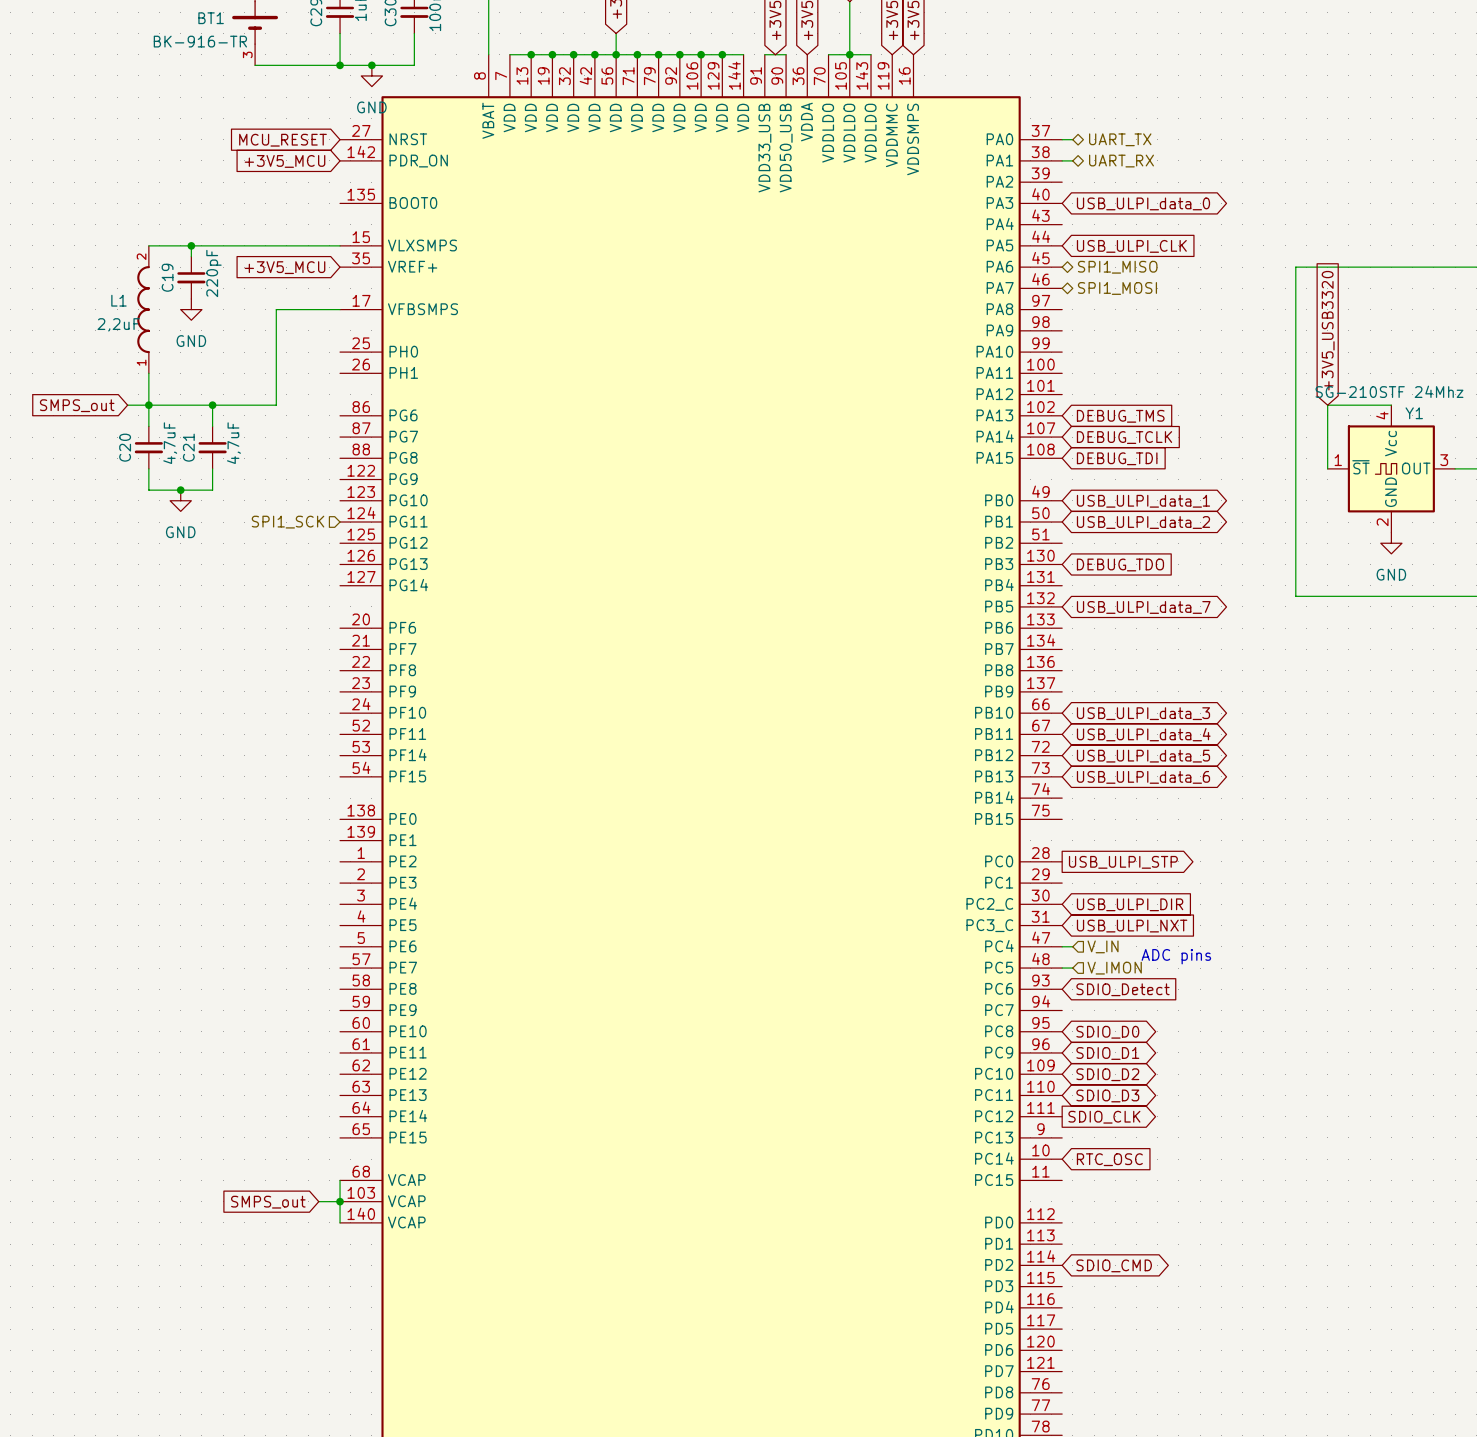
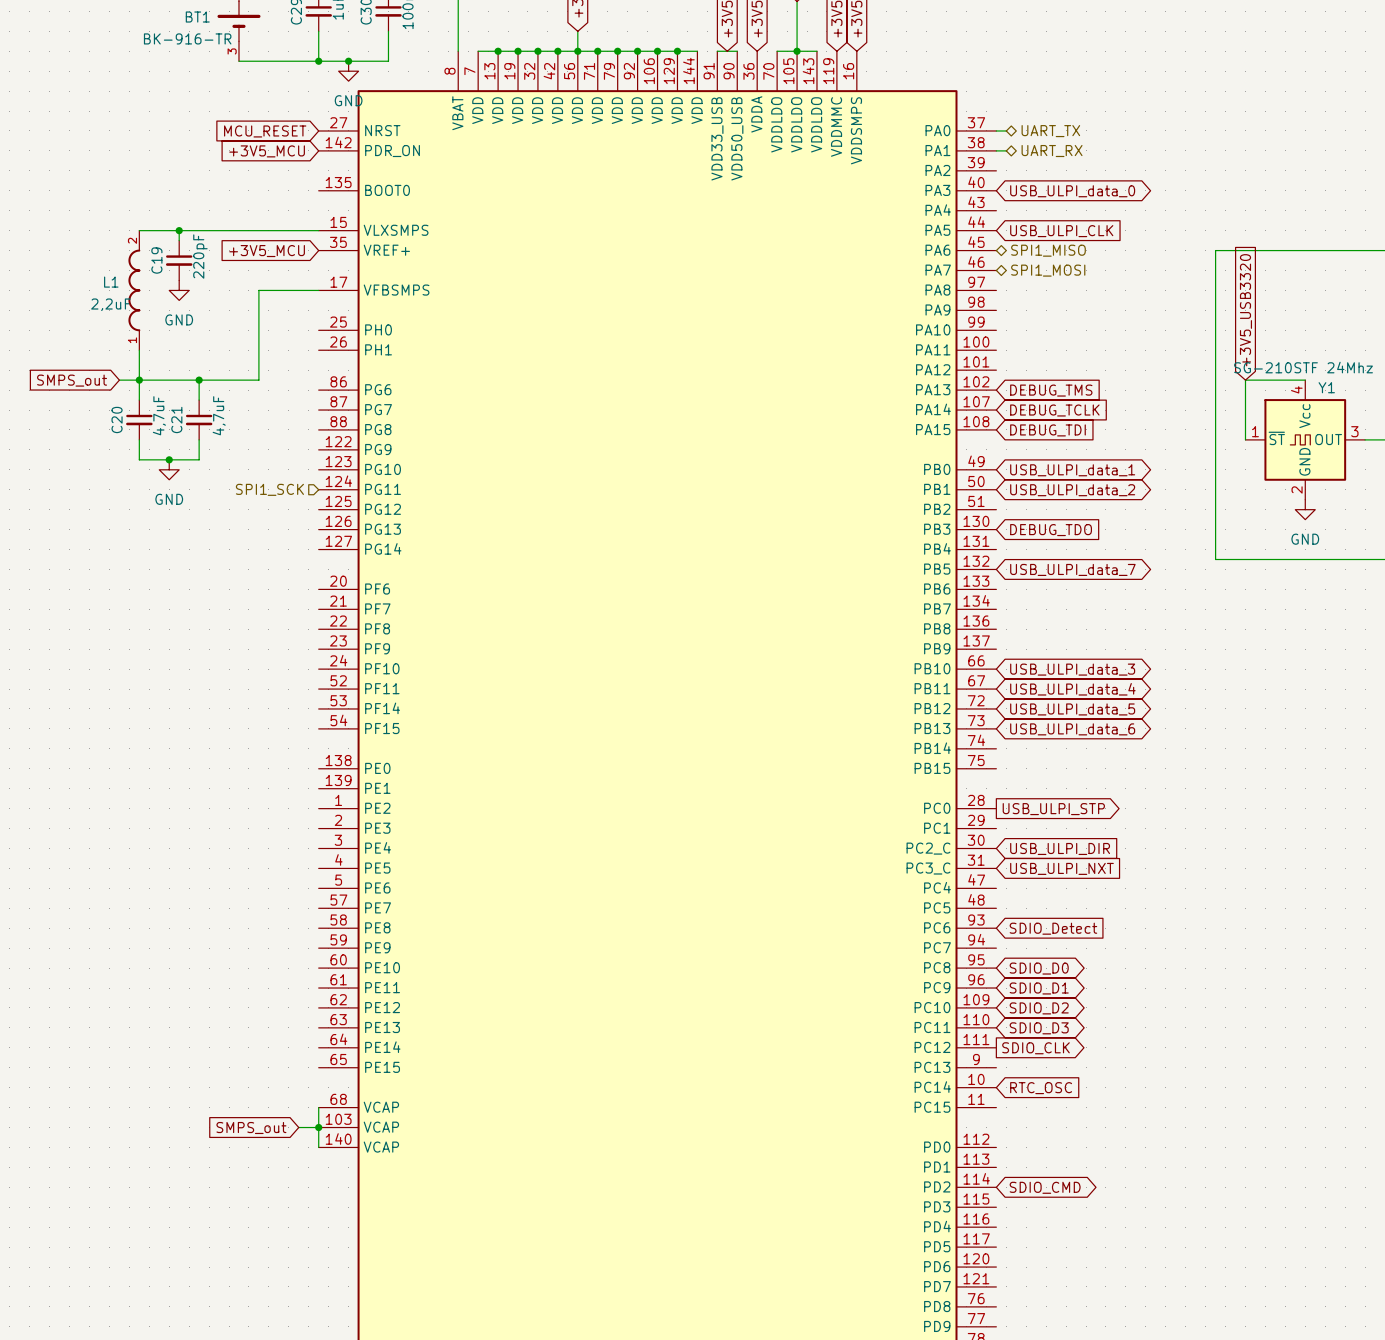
wire: (1062, 946) (1072, 946) -> none
hierarchical label: V_IN (1103, 946) -> none
text: ADC pins (1176, 956) -> none
wire: (1062, 968) (1072, 968) -> none
hierarchical label: V_IMON (1114, 968) -> none

